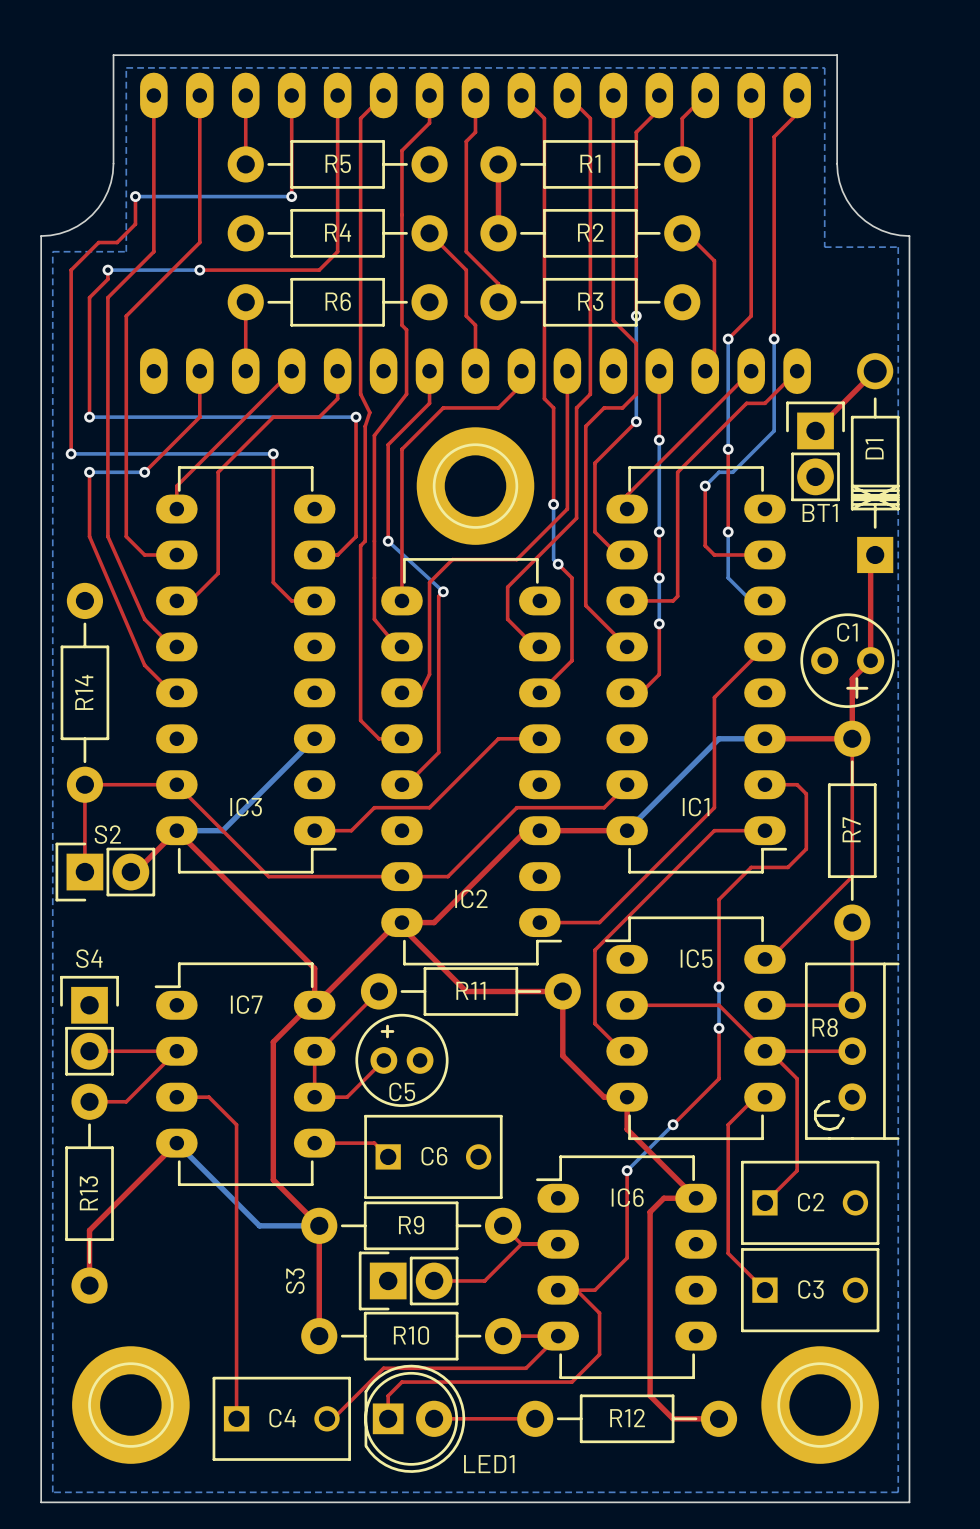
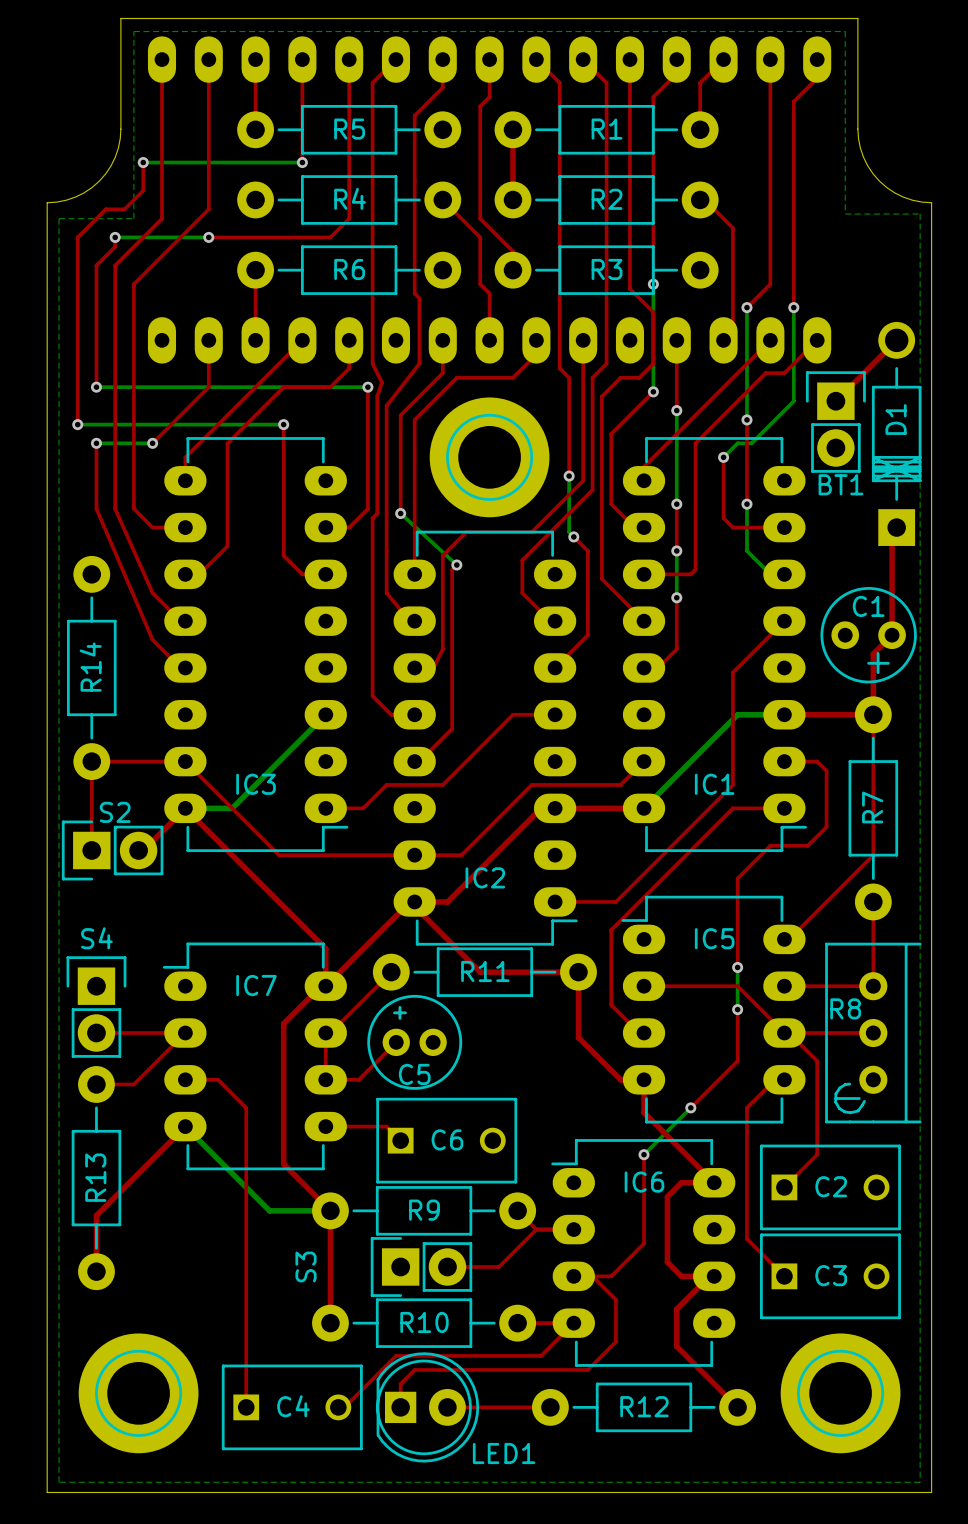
top track: (650, 1276) (650, 1395) (673, 1418) (719, 1418) -> (667, 1262) (681, 1276) (709, 1276) (676, 1309) (676, 1346) (737, 1407)

